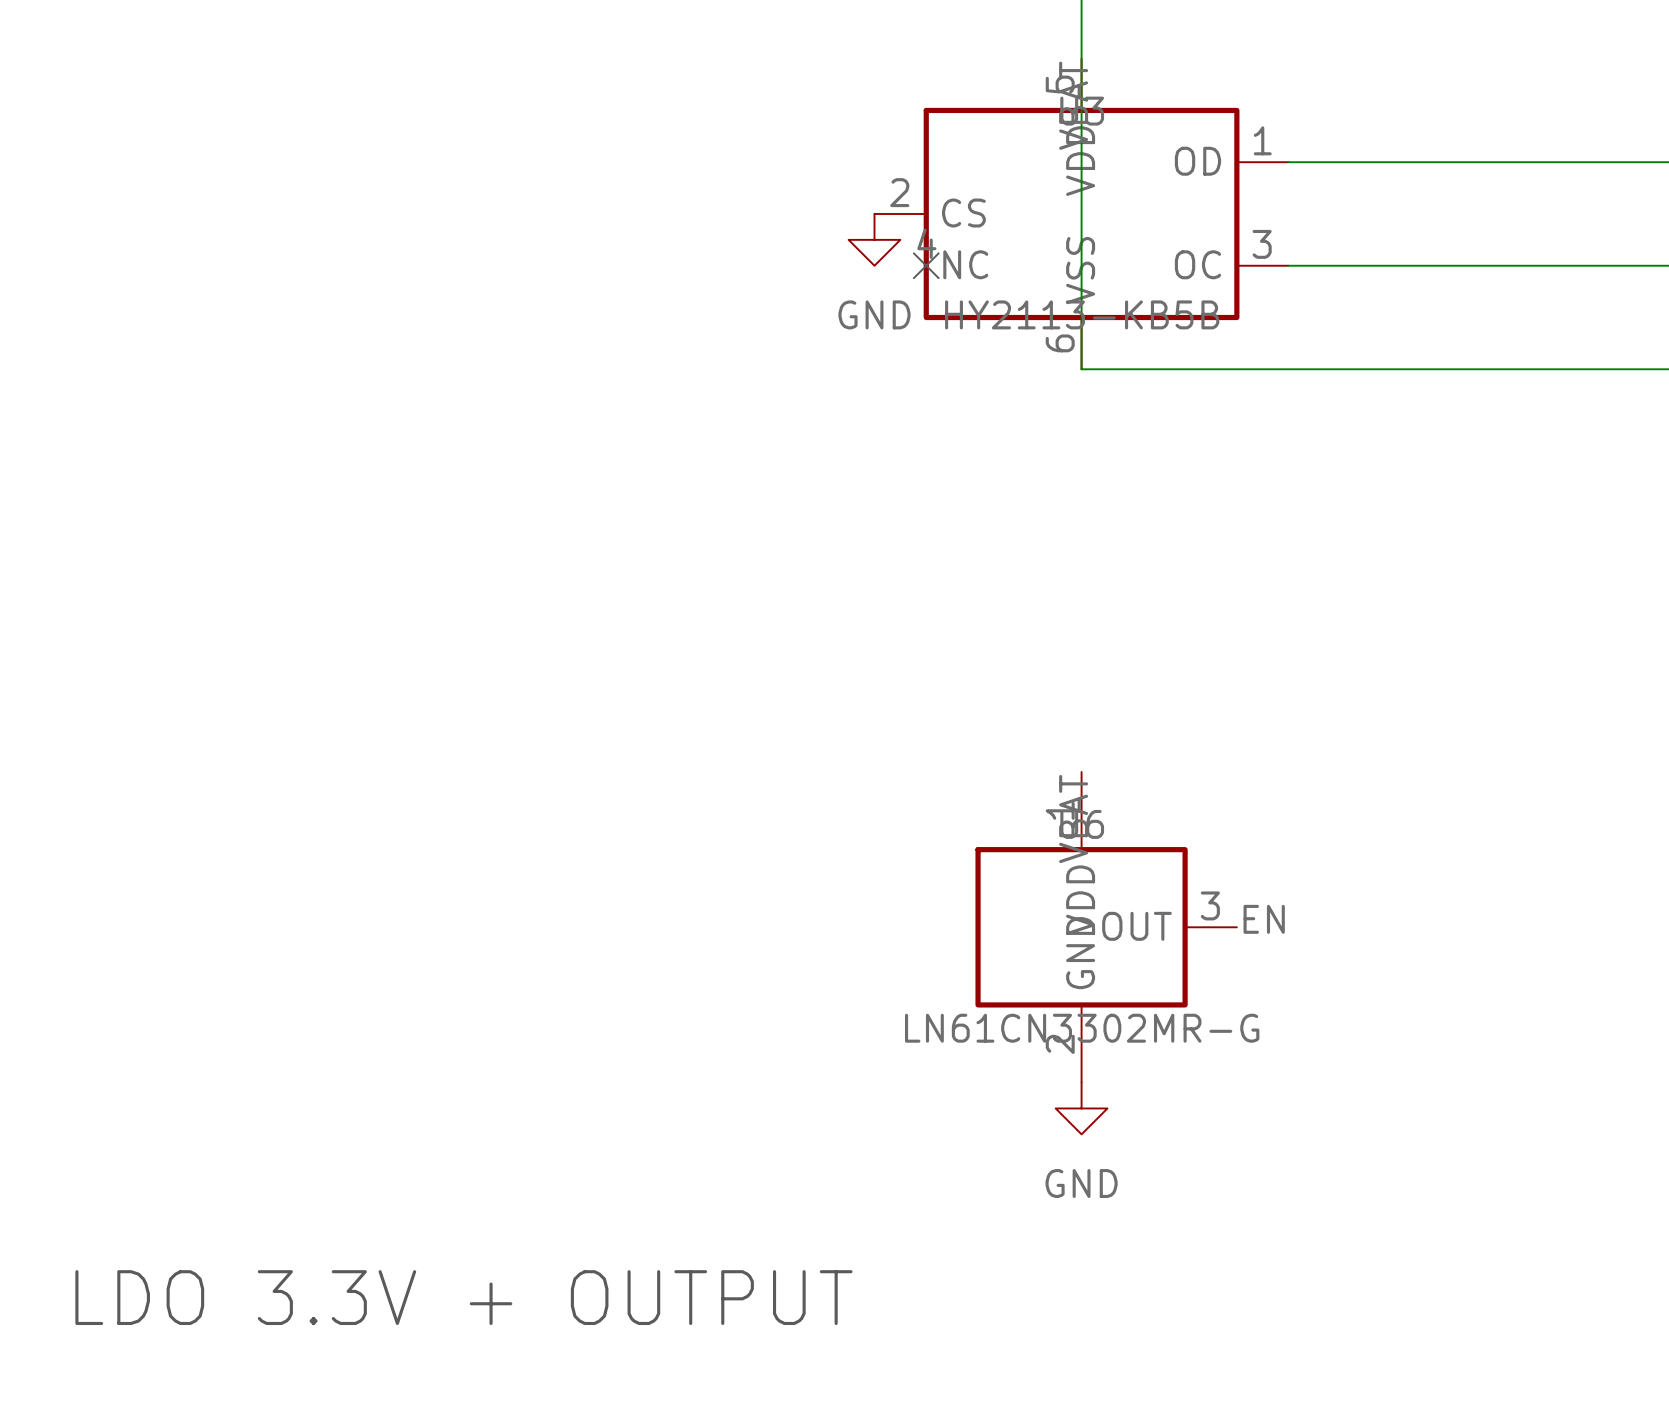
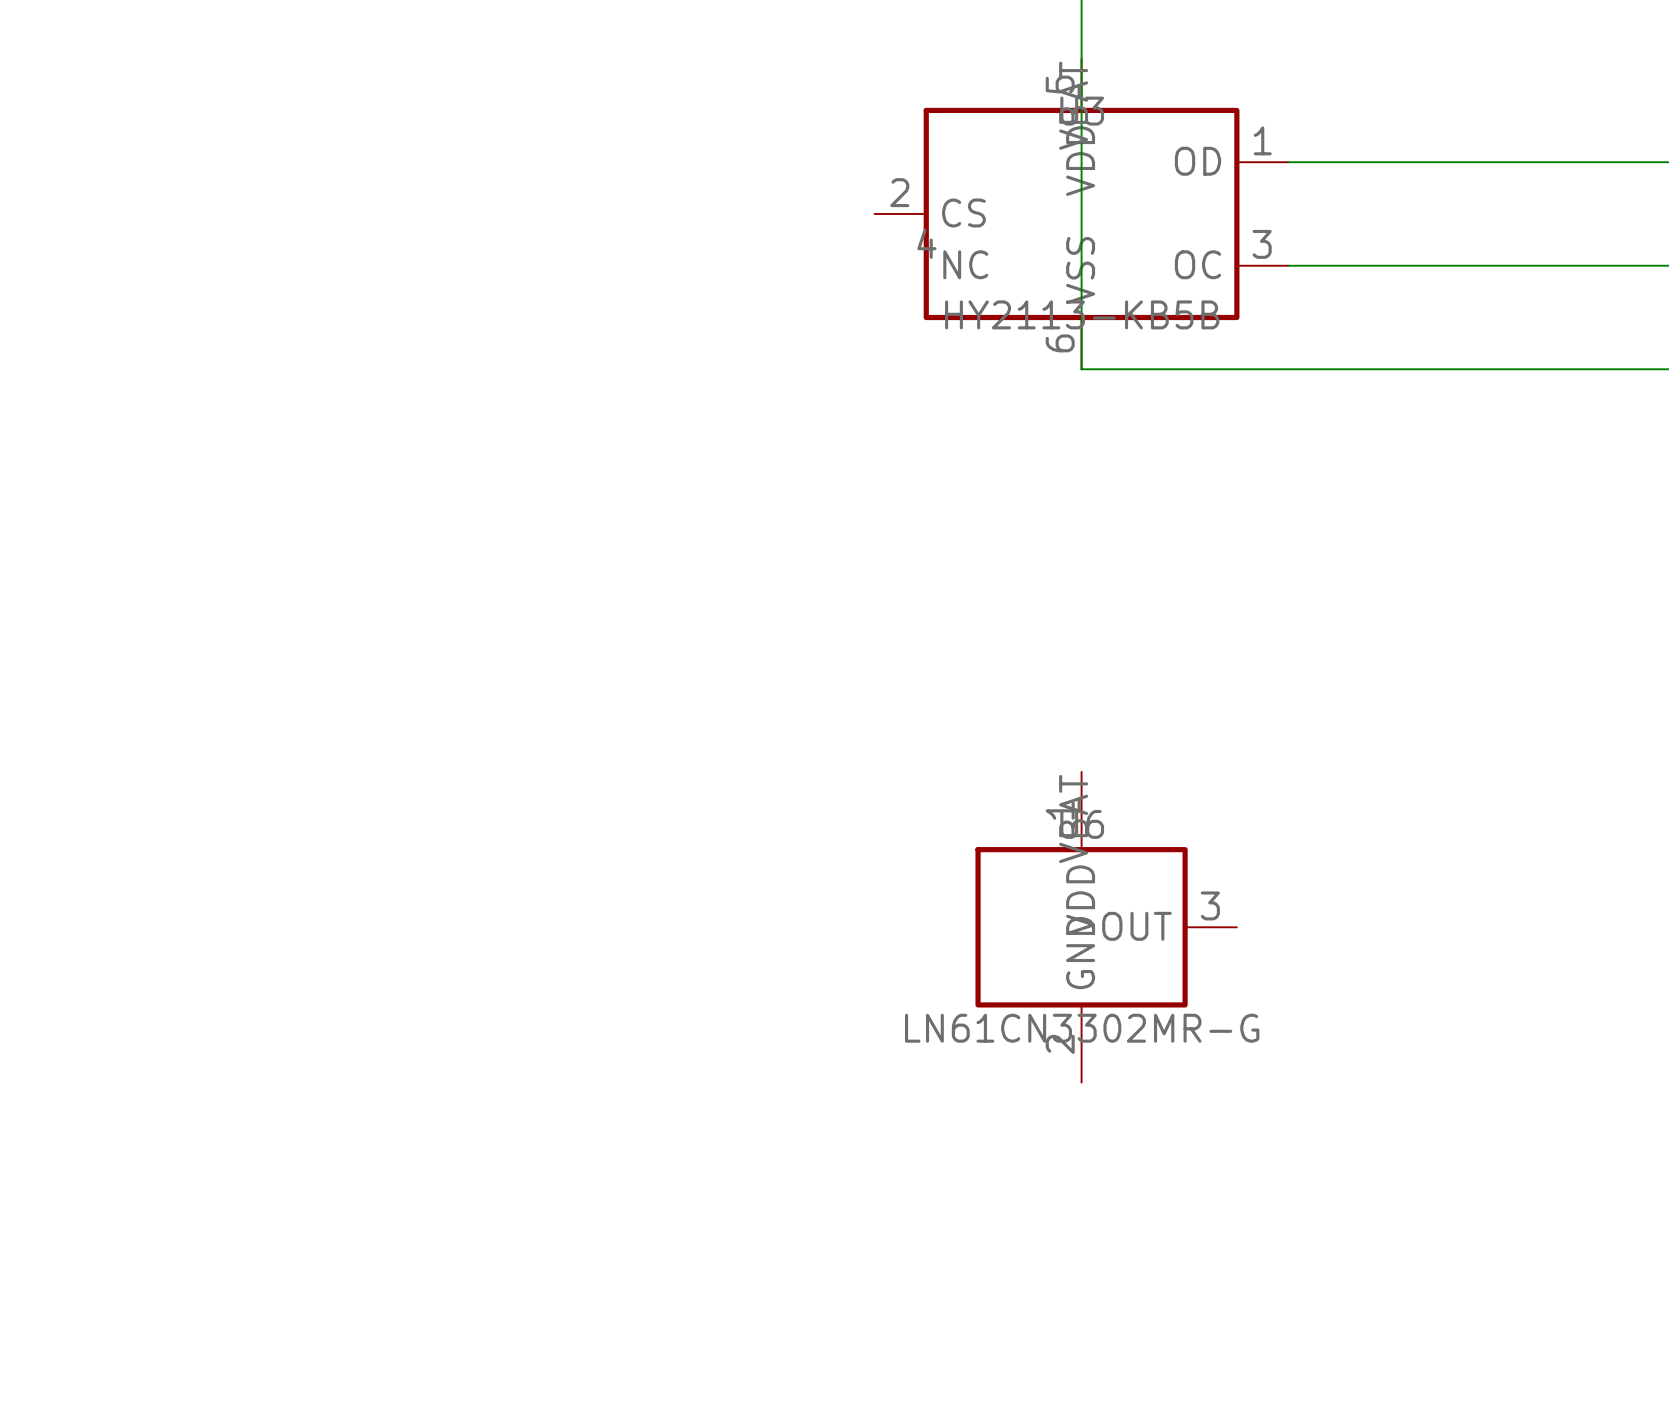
power symbol: GND (874, 239) -> none
no-connect mark: (926, 265) -> none
label: EN (1264, 919) -> none
power symbol: GND (1081, 1108) -> none
text: LDO 3.3V + OUTPUT (463, 1297) -> none

